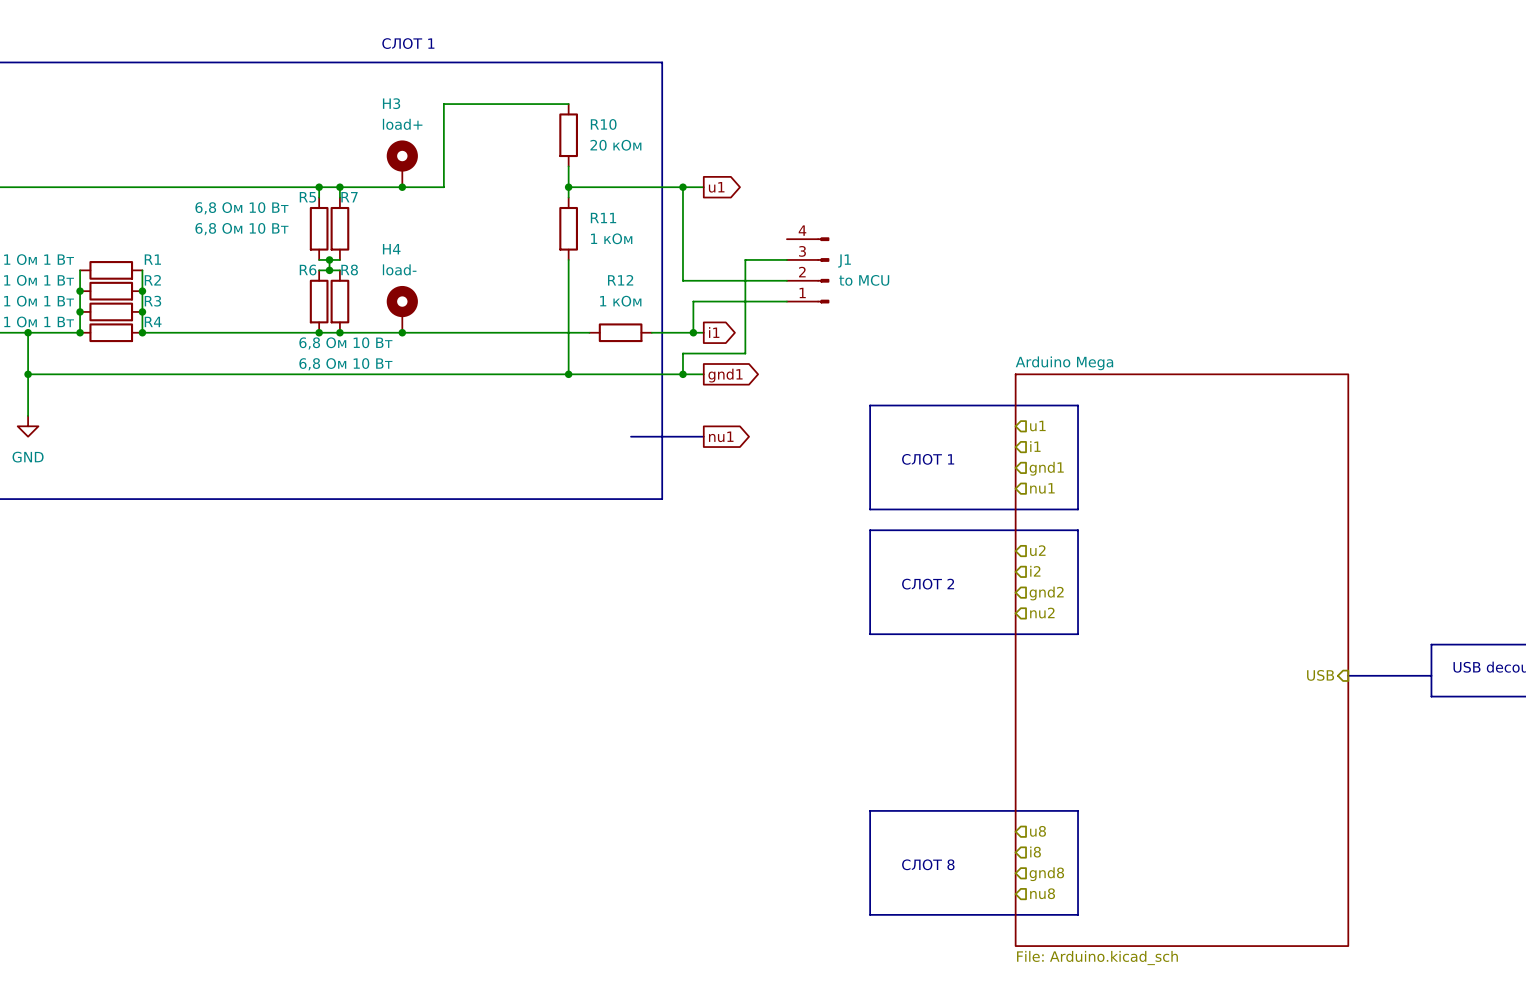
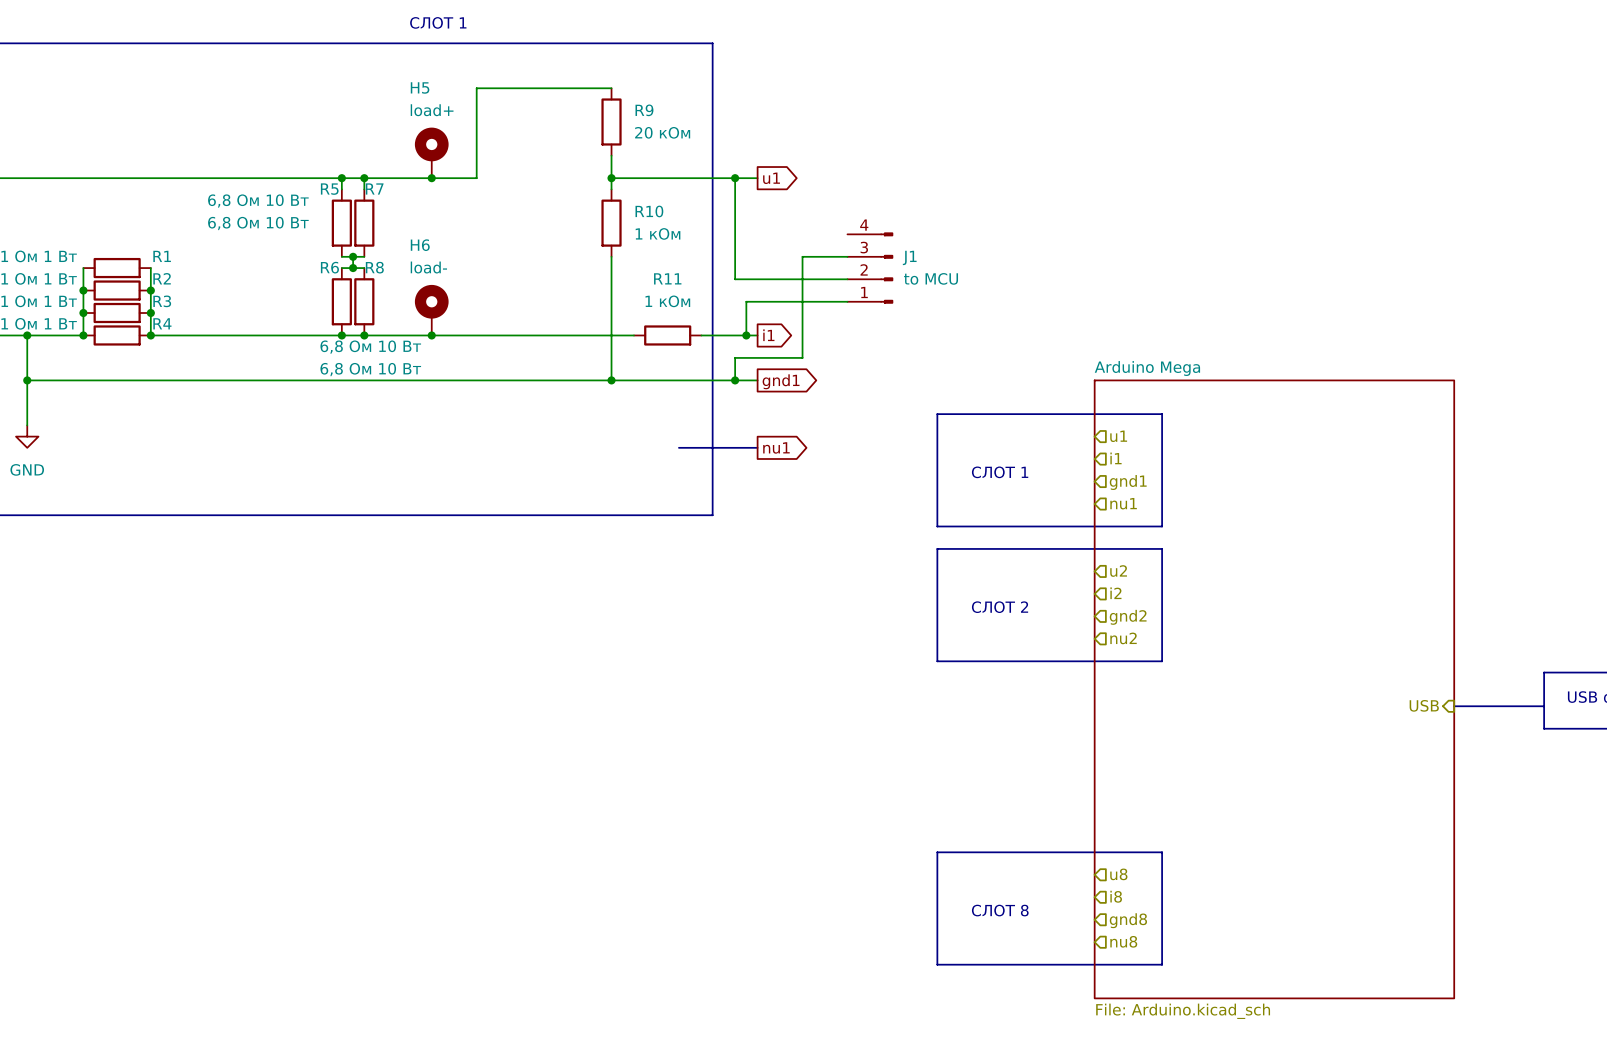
H3 name: H3 (391, 103) -> H5 (420, 87)
R10 name: R10 (603, 124) -> R9 (644, 110)
R11 name: R11 (603, 218) -> R10 (649, 211)
H4 name: H4 (391, 249) -> H6 (420, 245)
R12 name: R12 (620, 280) -> R11 (667, 278)

